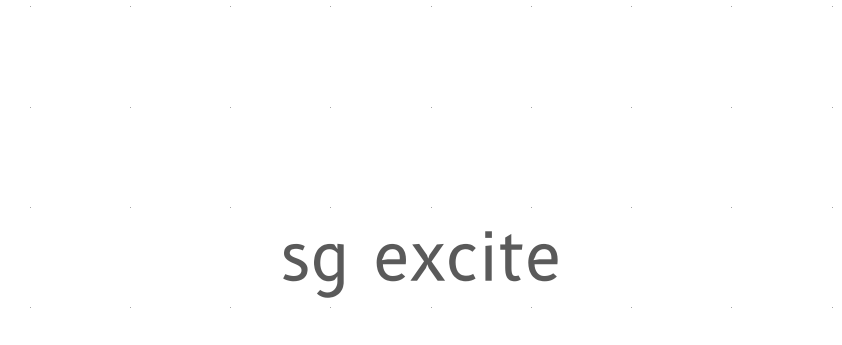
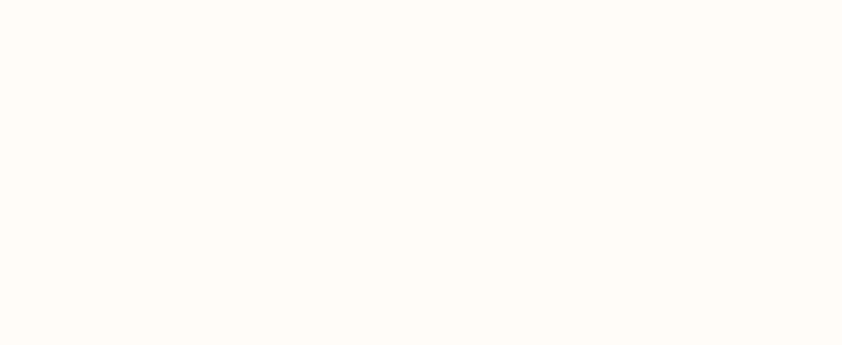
text: sg excite (420, 264) -> none

